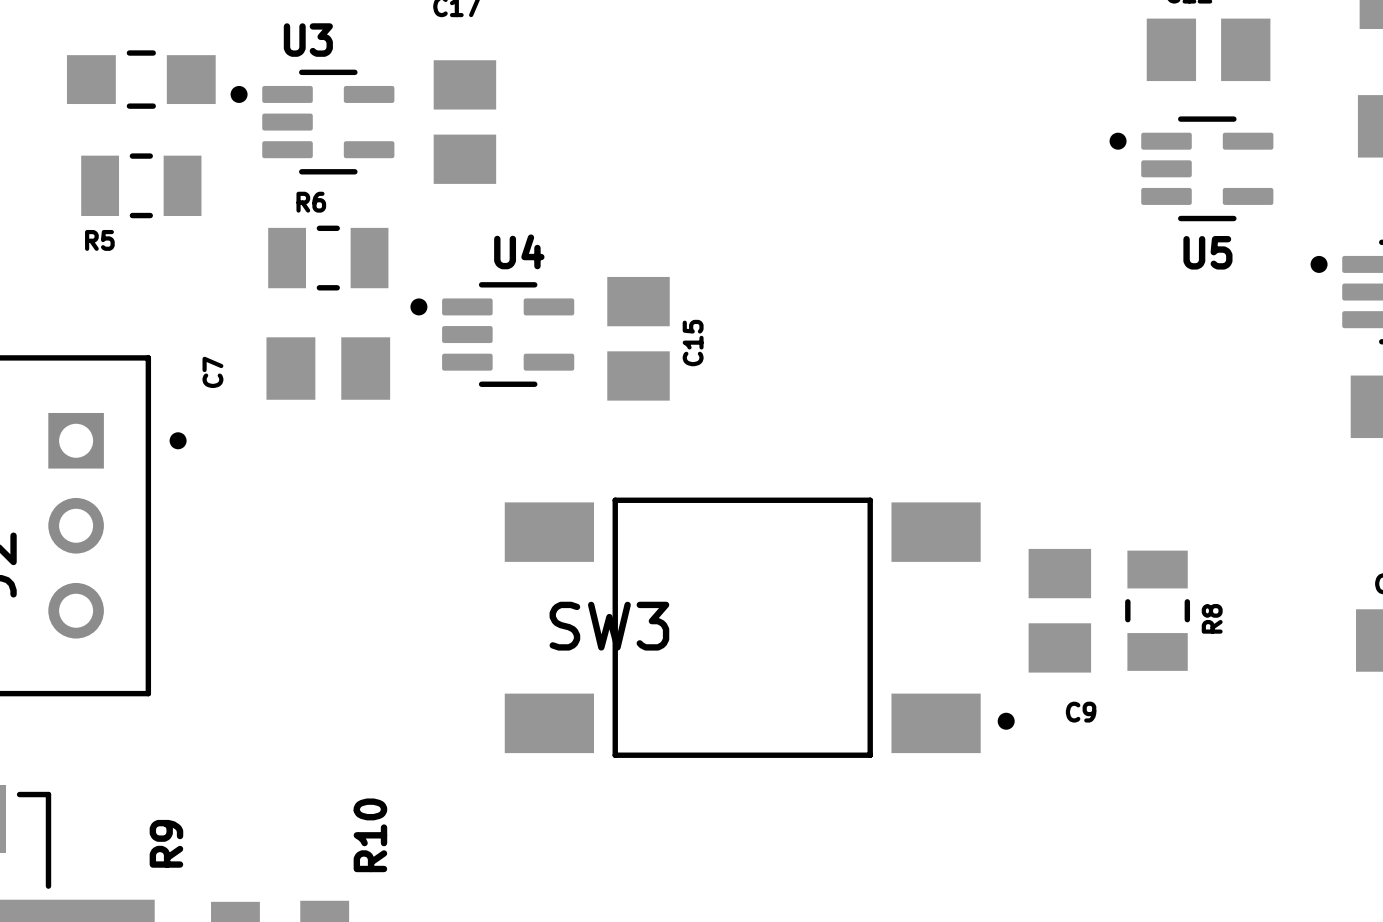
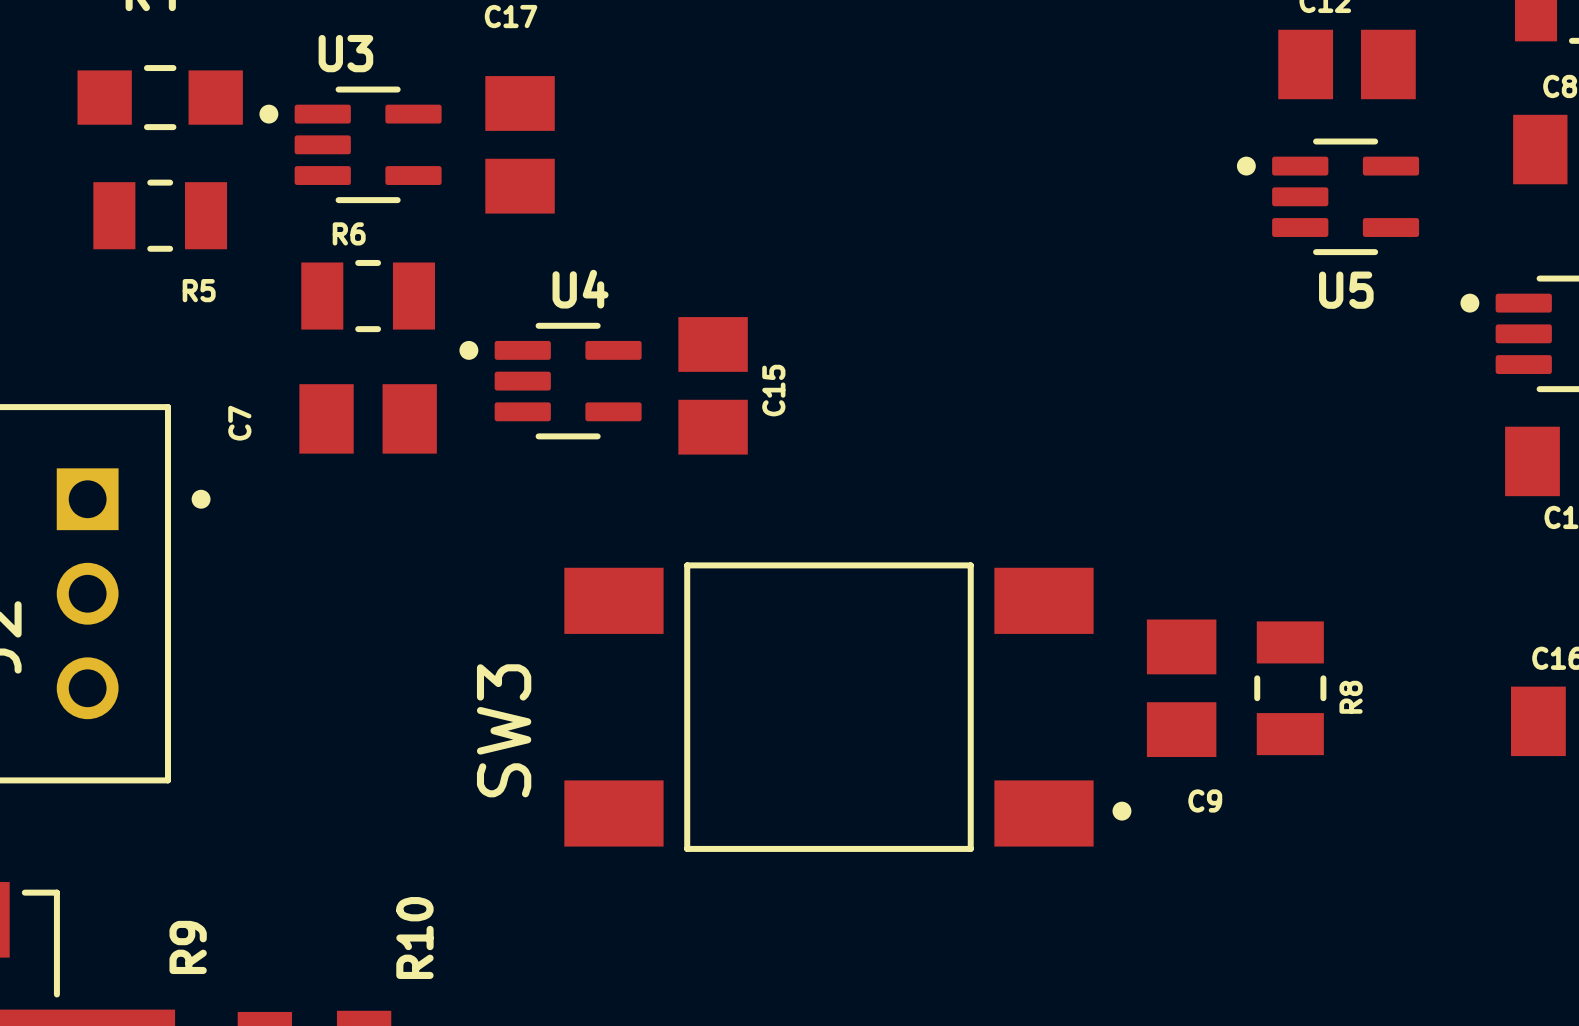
R5 name position: R5 (99, 240) -> R5 (199, 290)
SW3 name rotation: 0° (609, 626) -> 90° counterclockwise (504, 730)

